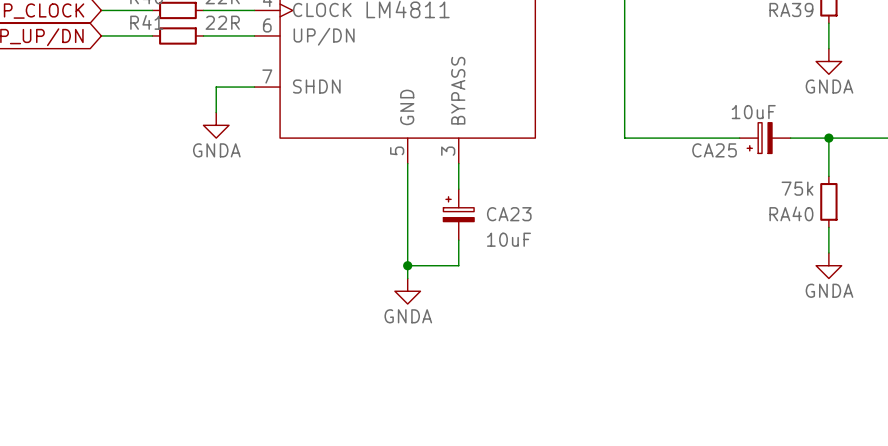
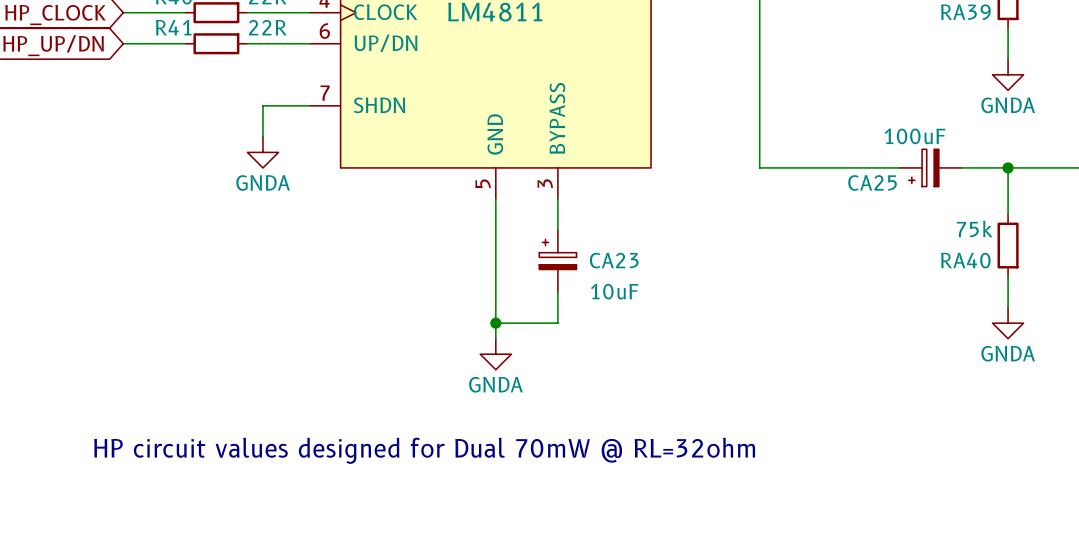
CA25 value: 10uF (753, 112) -> 100uF (915, 136)
text: none -> HP circuit values designed for Dual 70mW @ RL=32ohm (424, 450)

